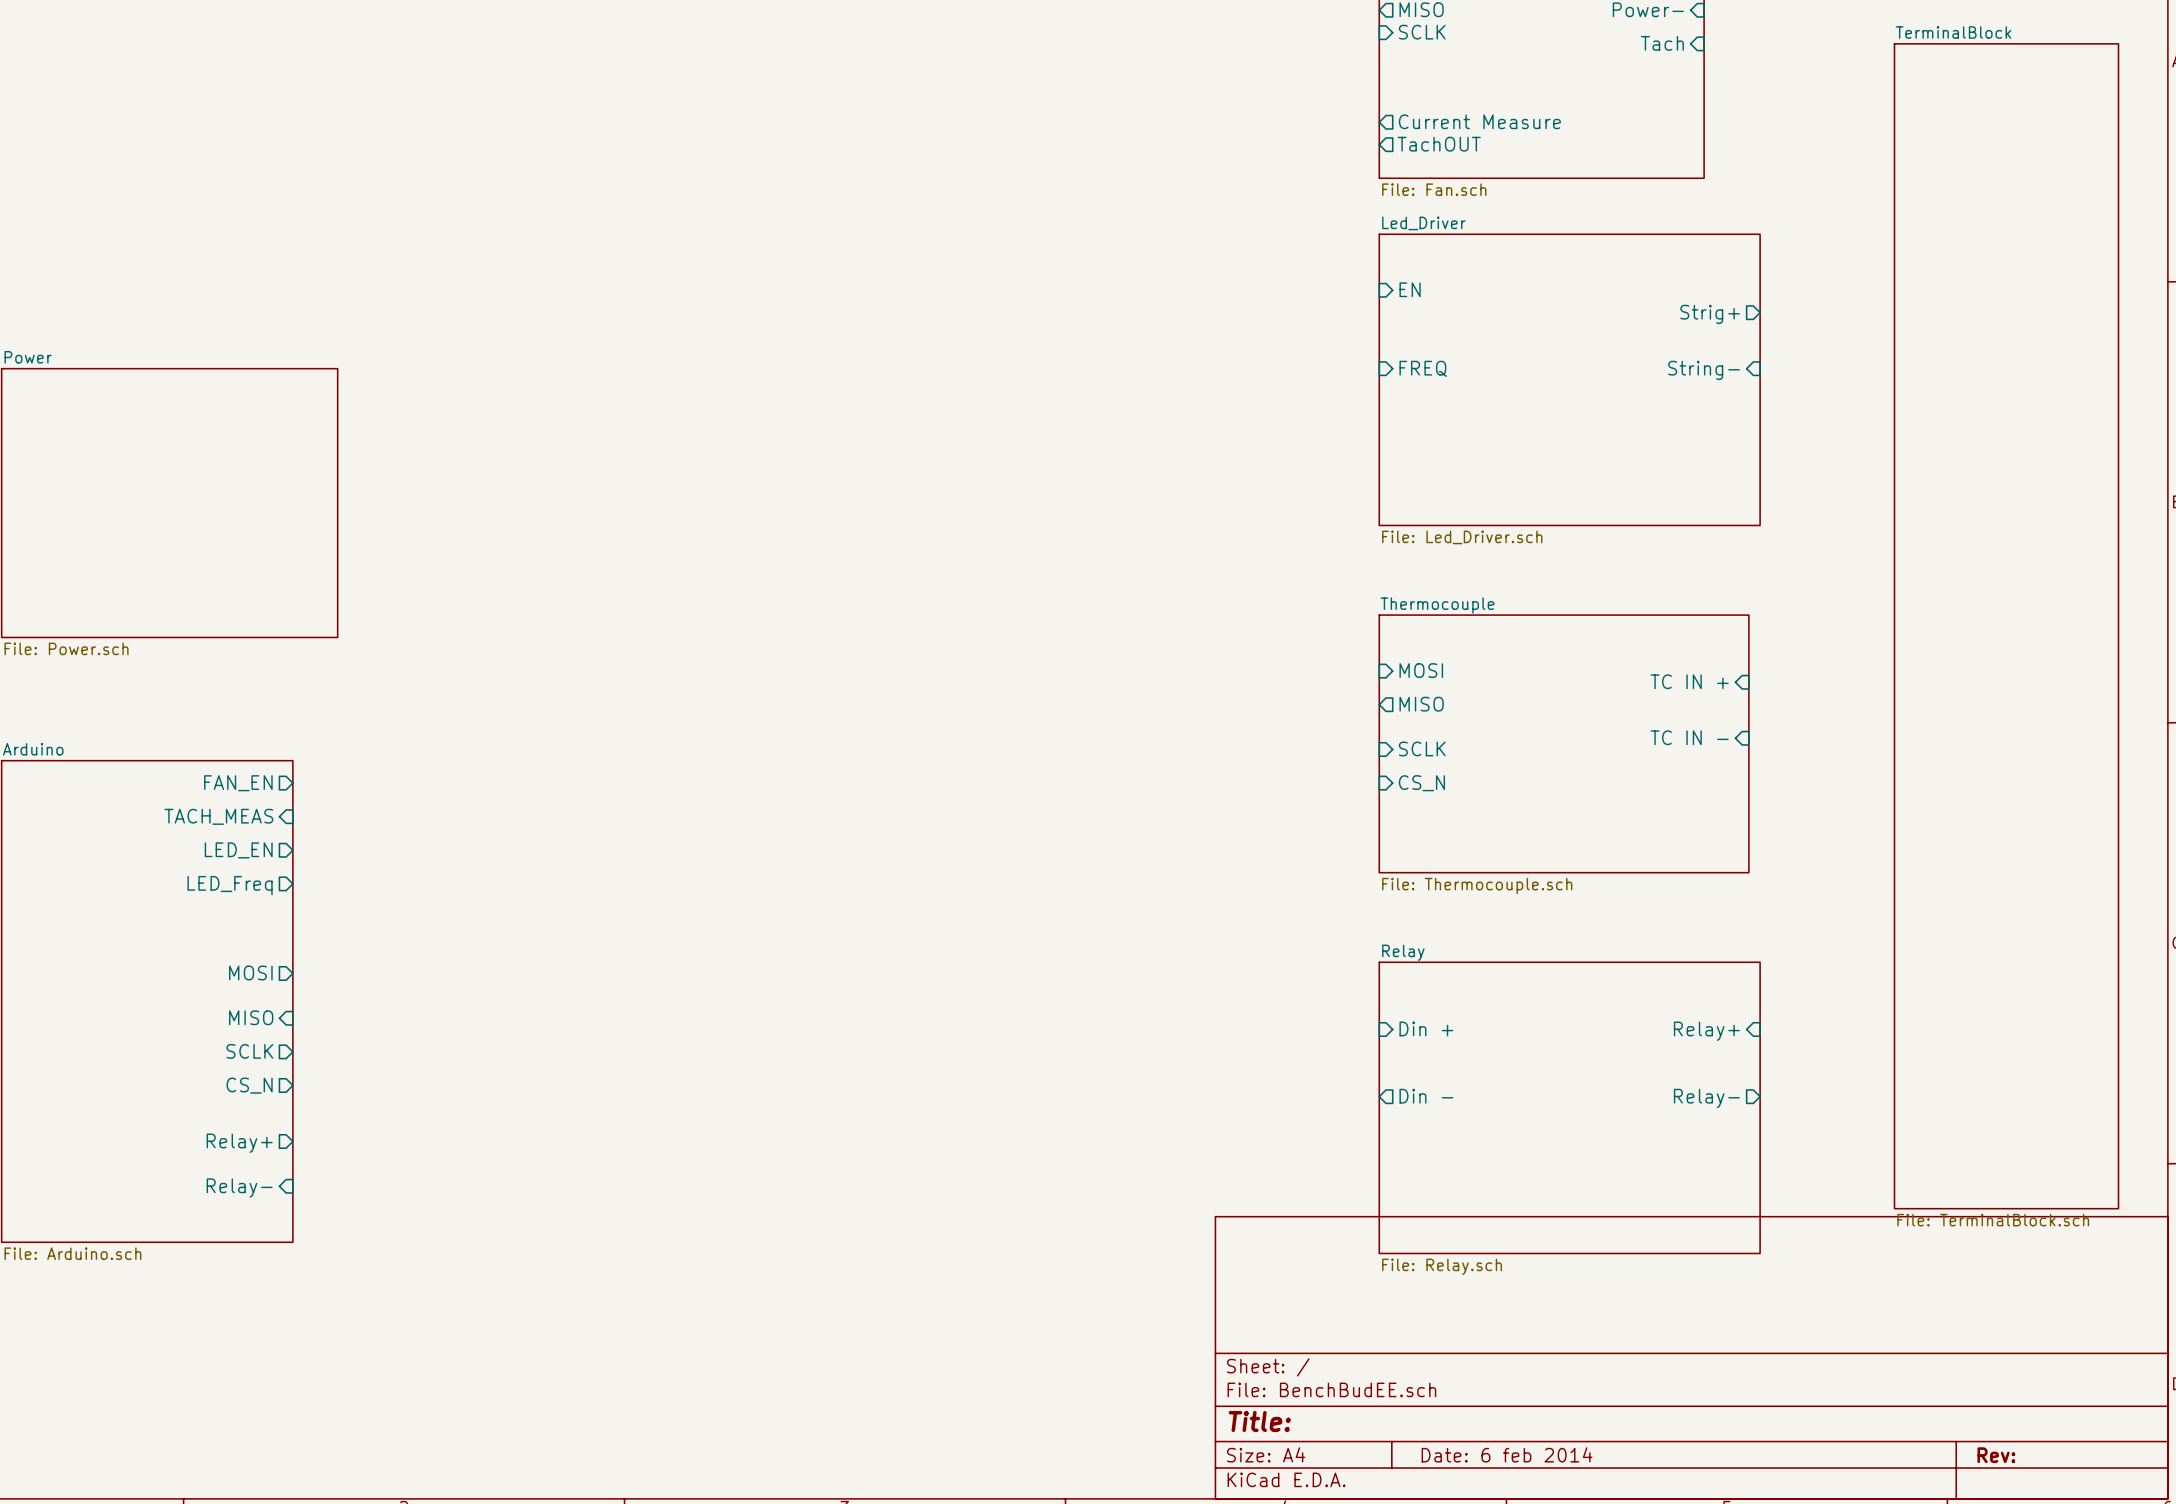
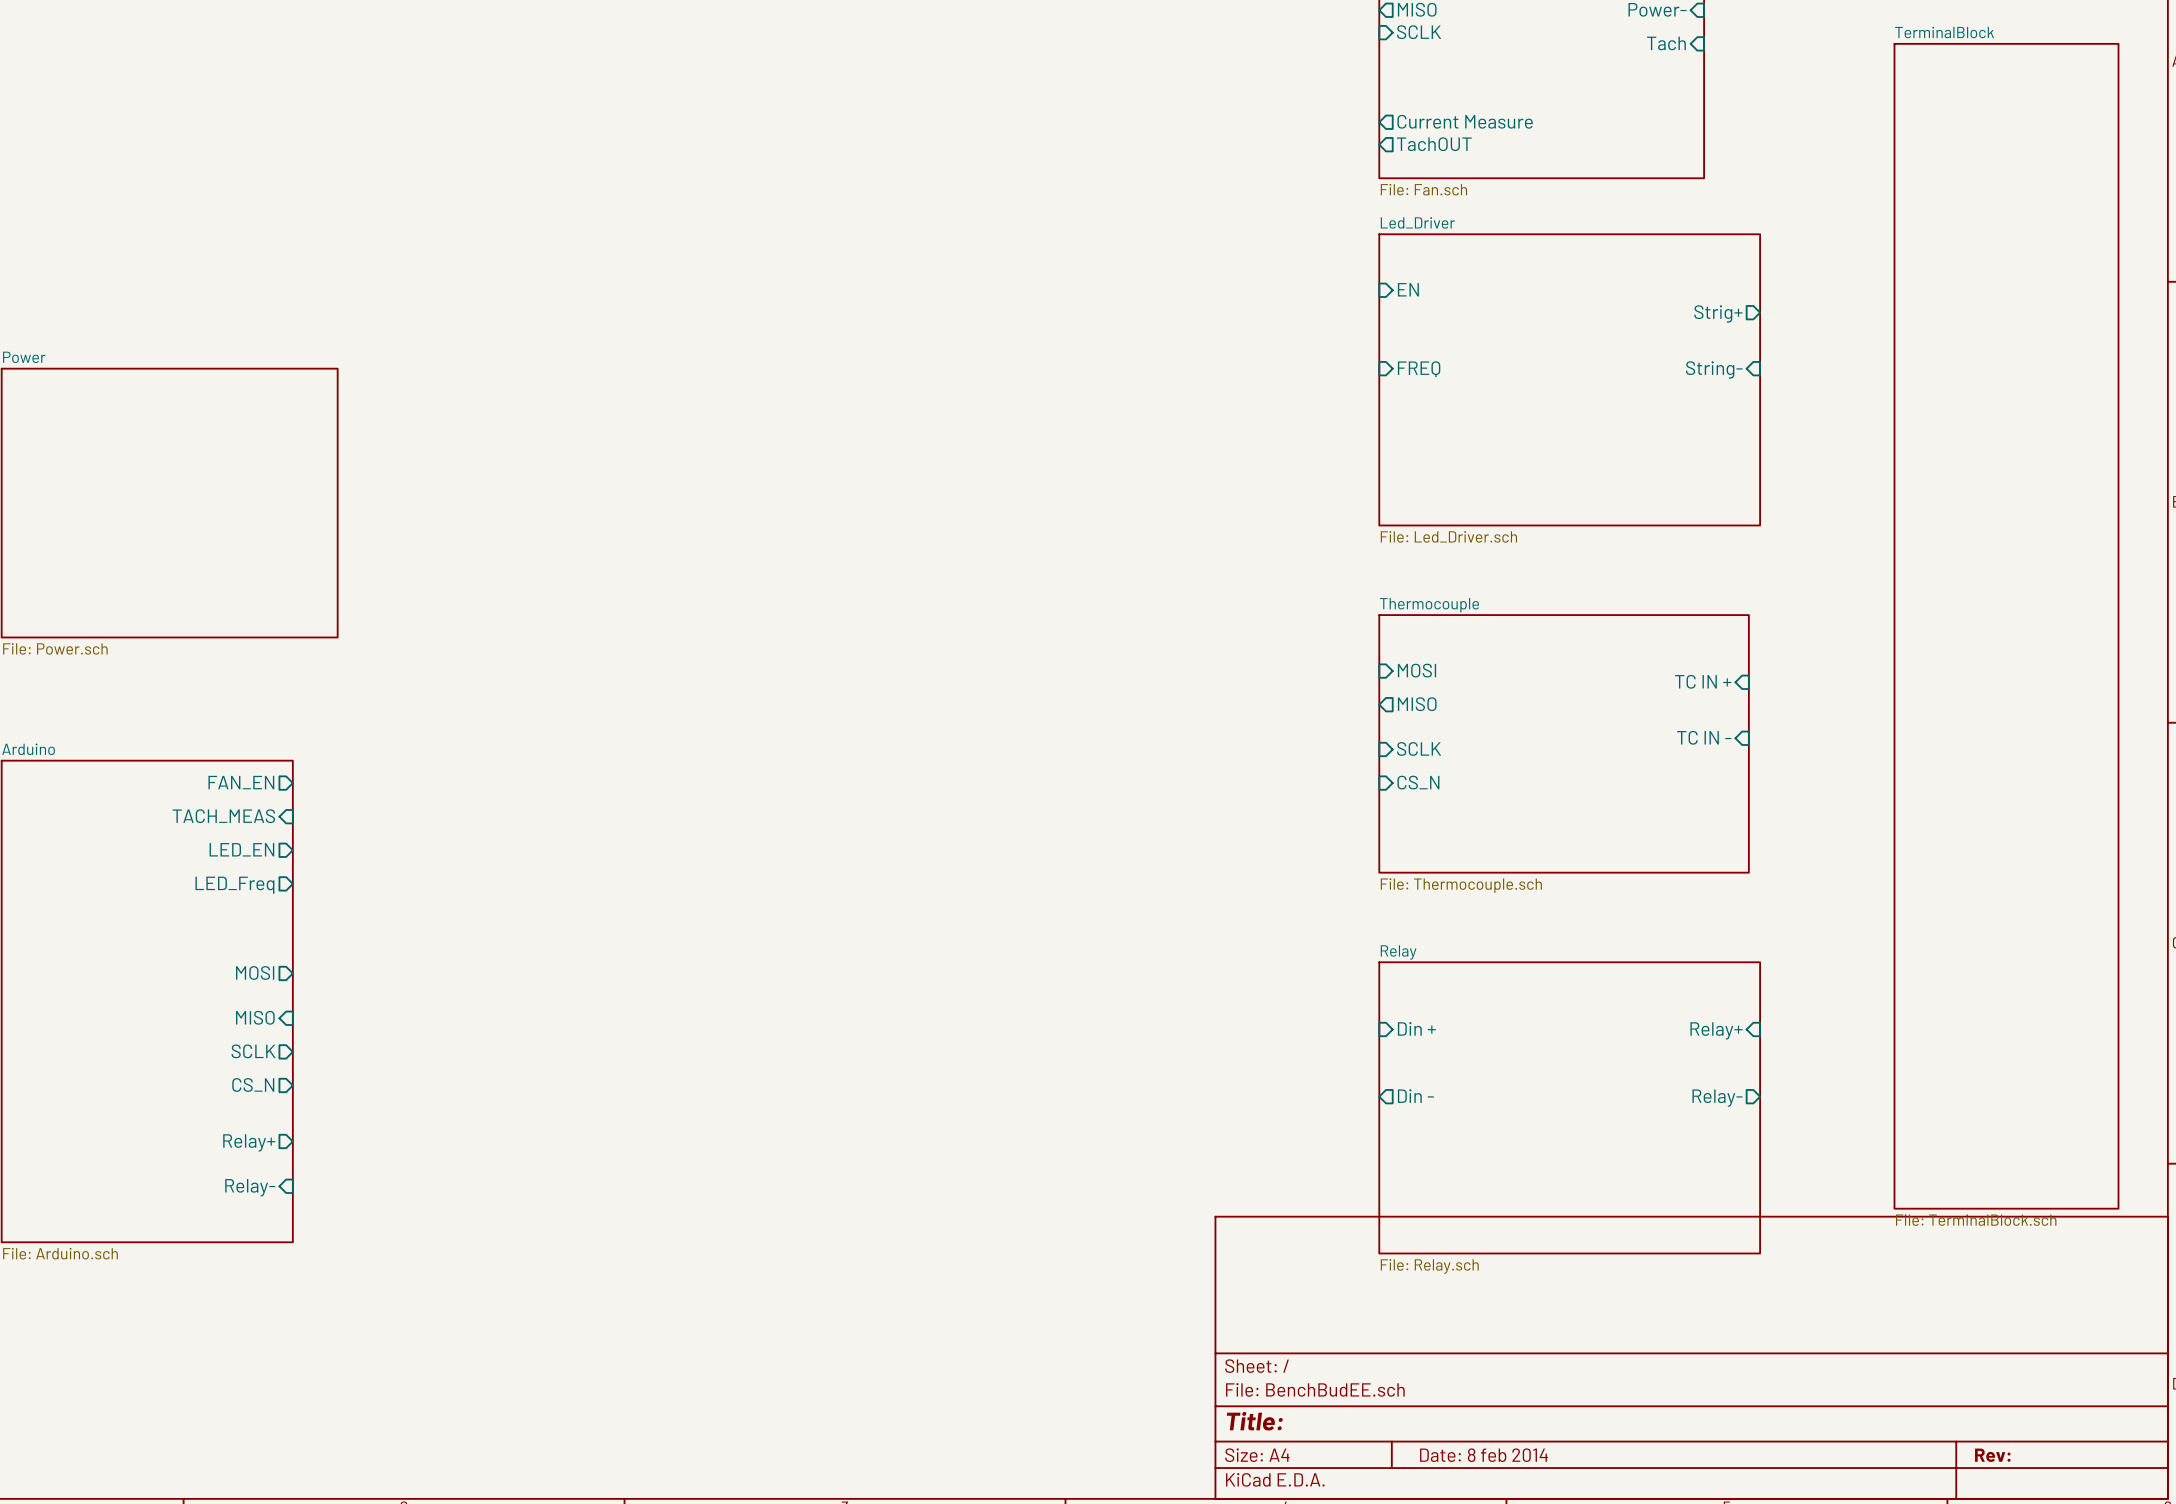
title block: Date: 6 feb 2014 (1507, 1454) -> Date: 8 feb 2014 (1484, 1455)

